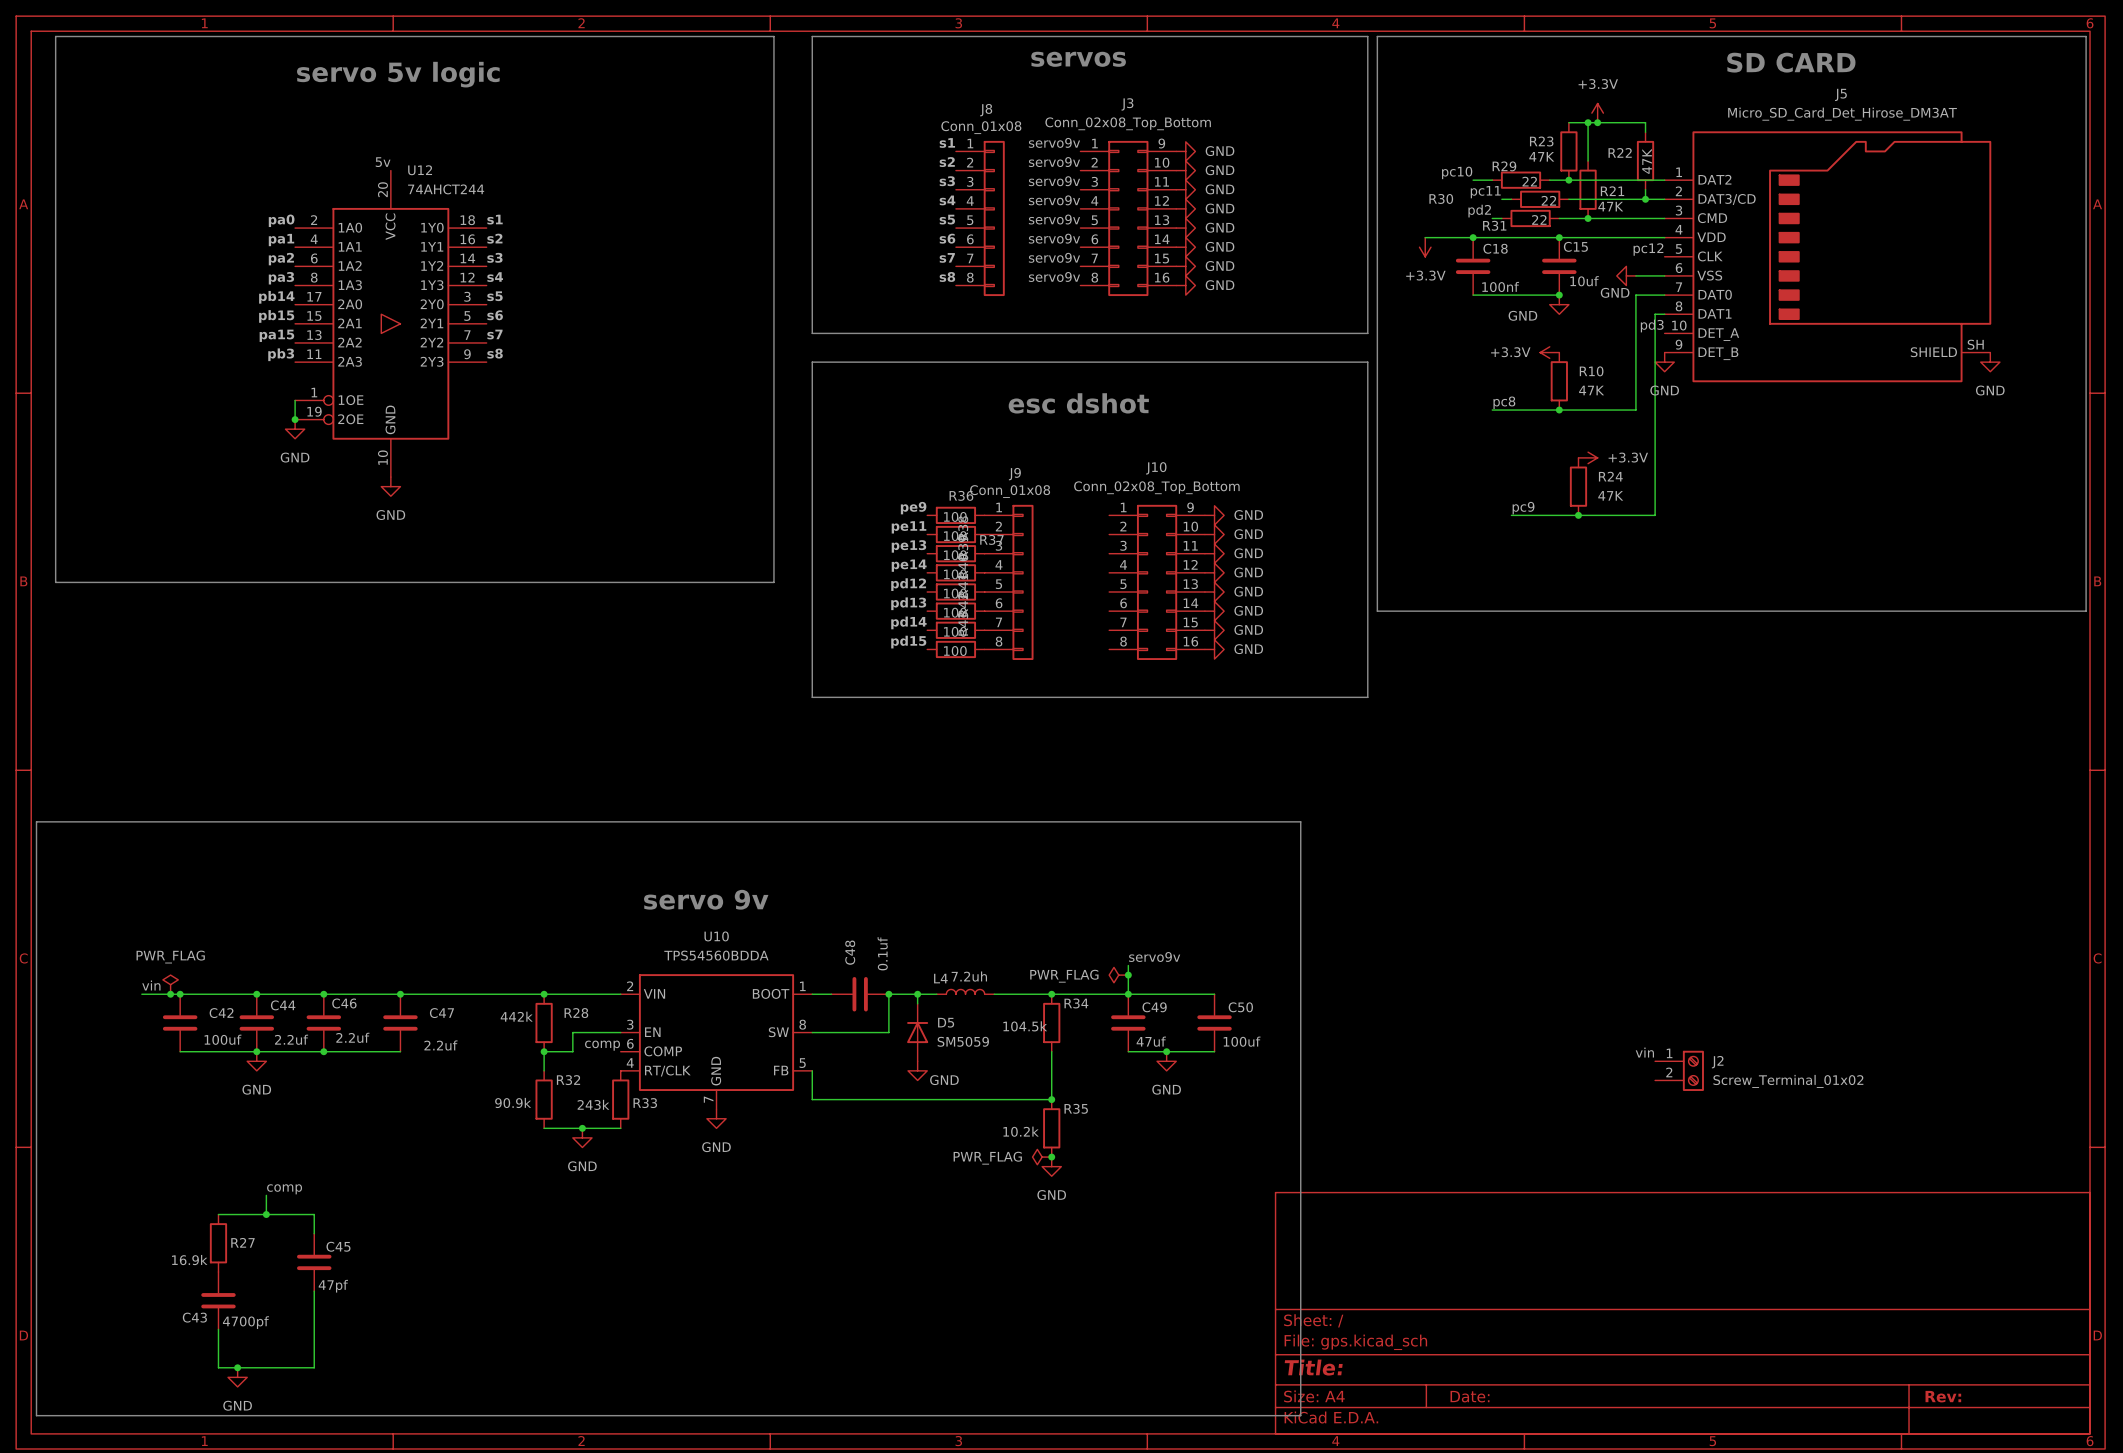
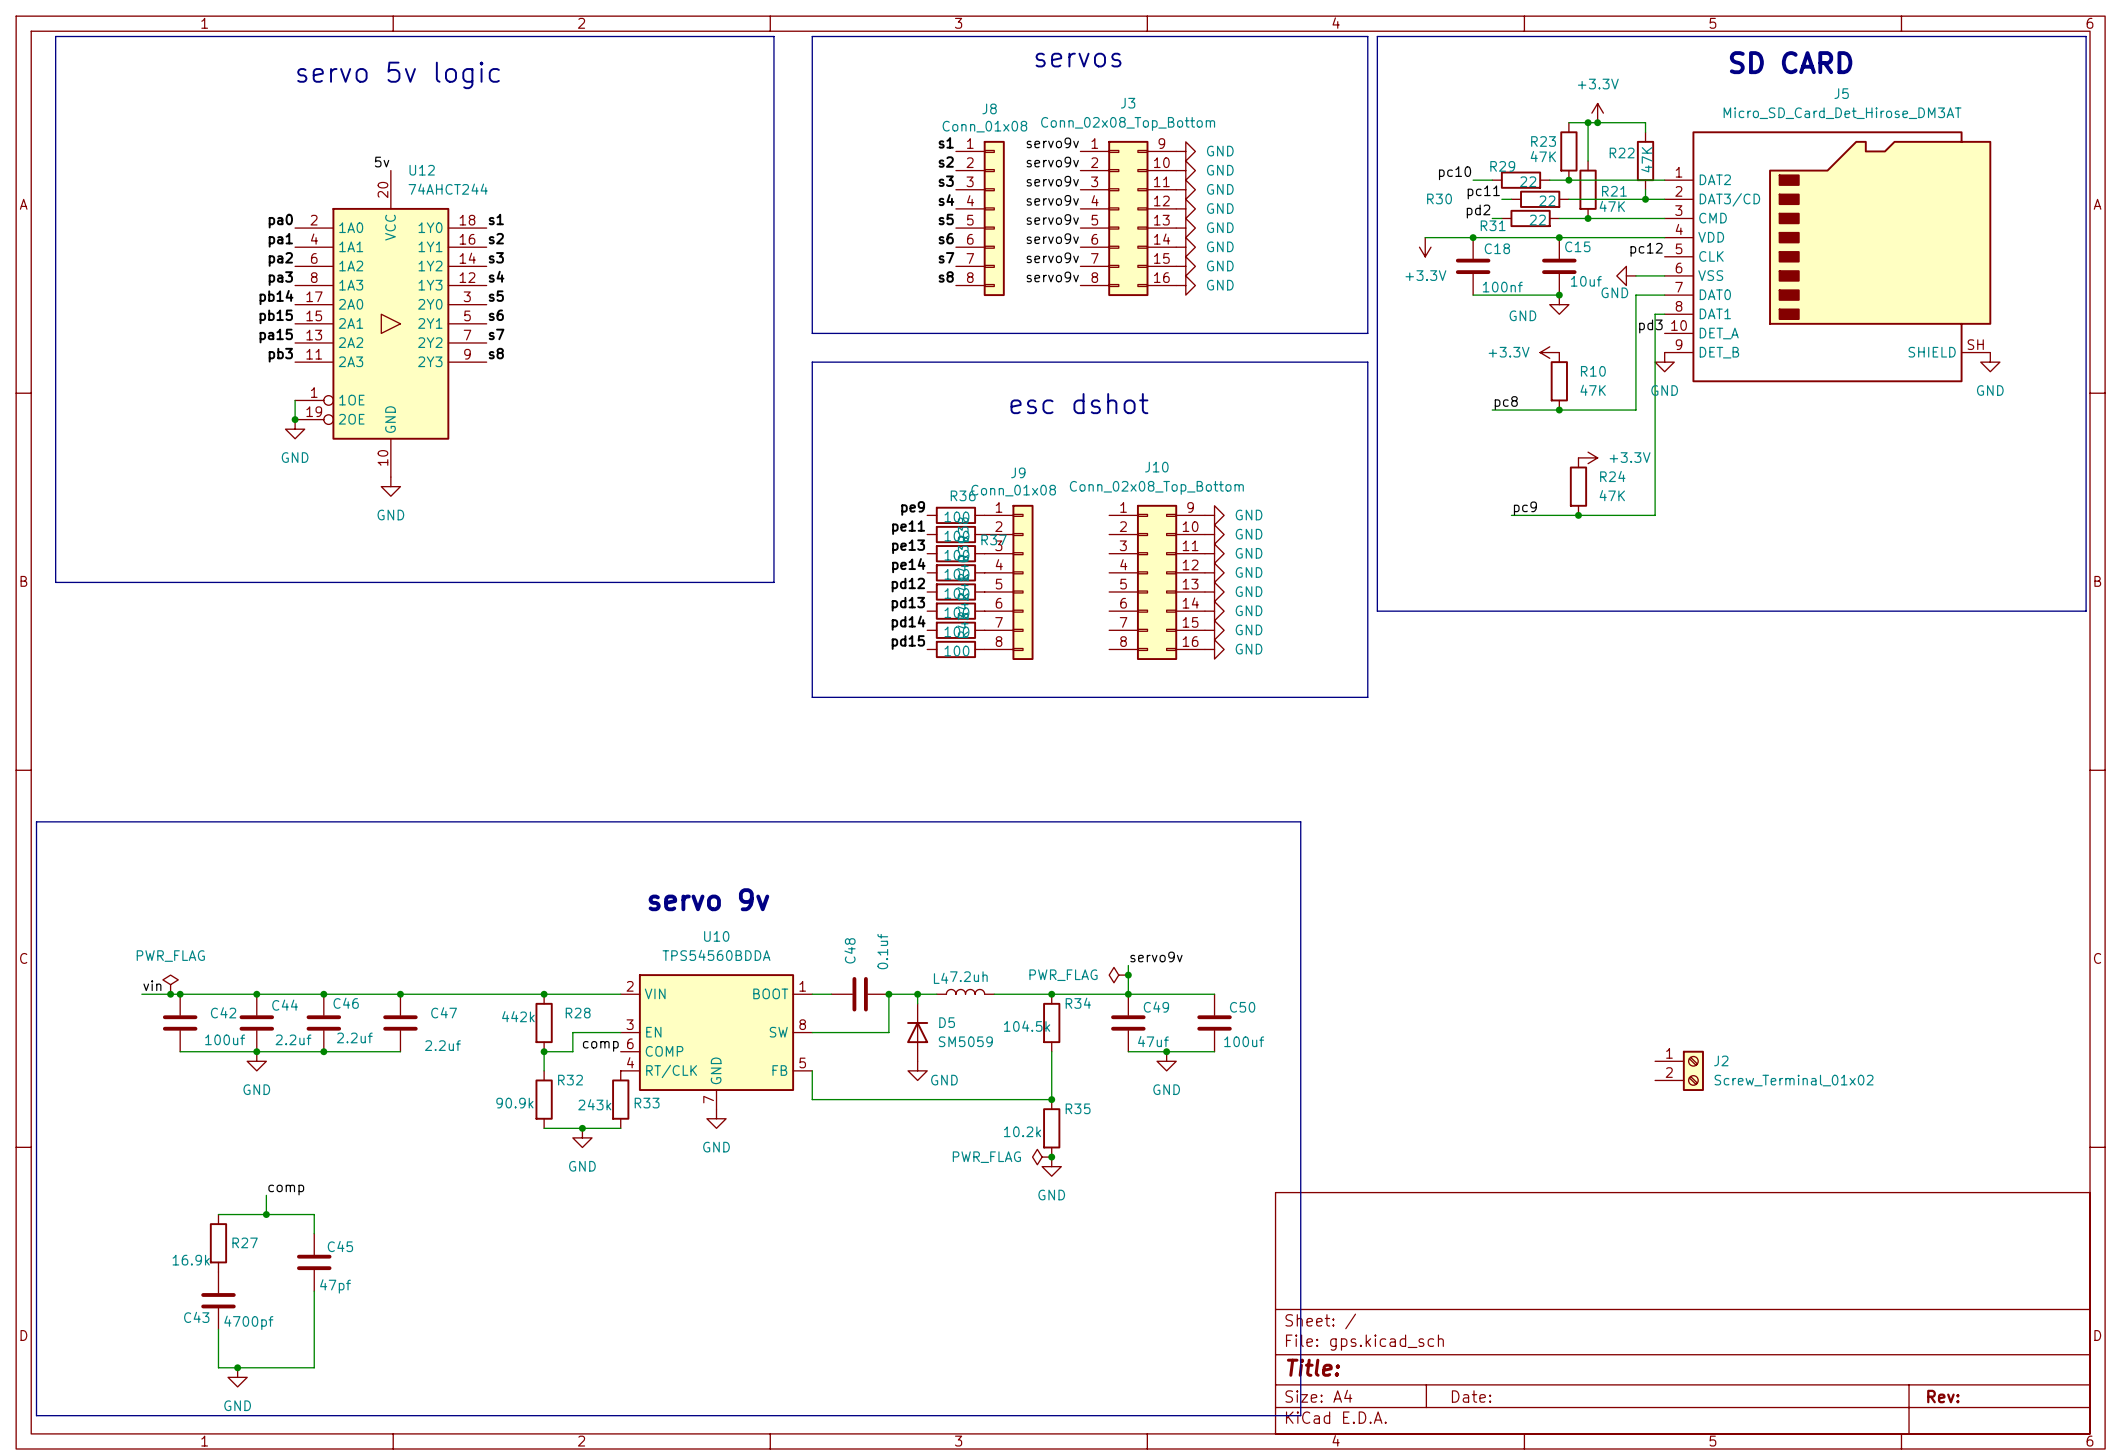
label: vin (1644, 1052) -> none

